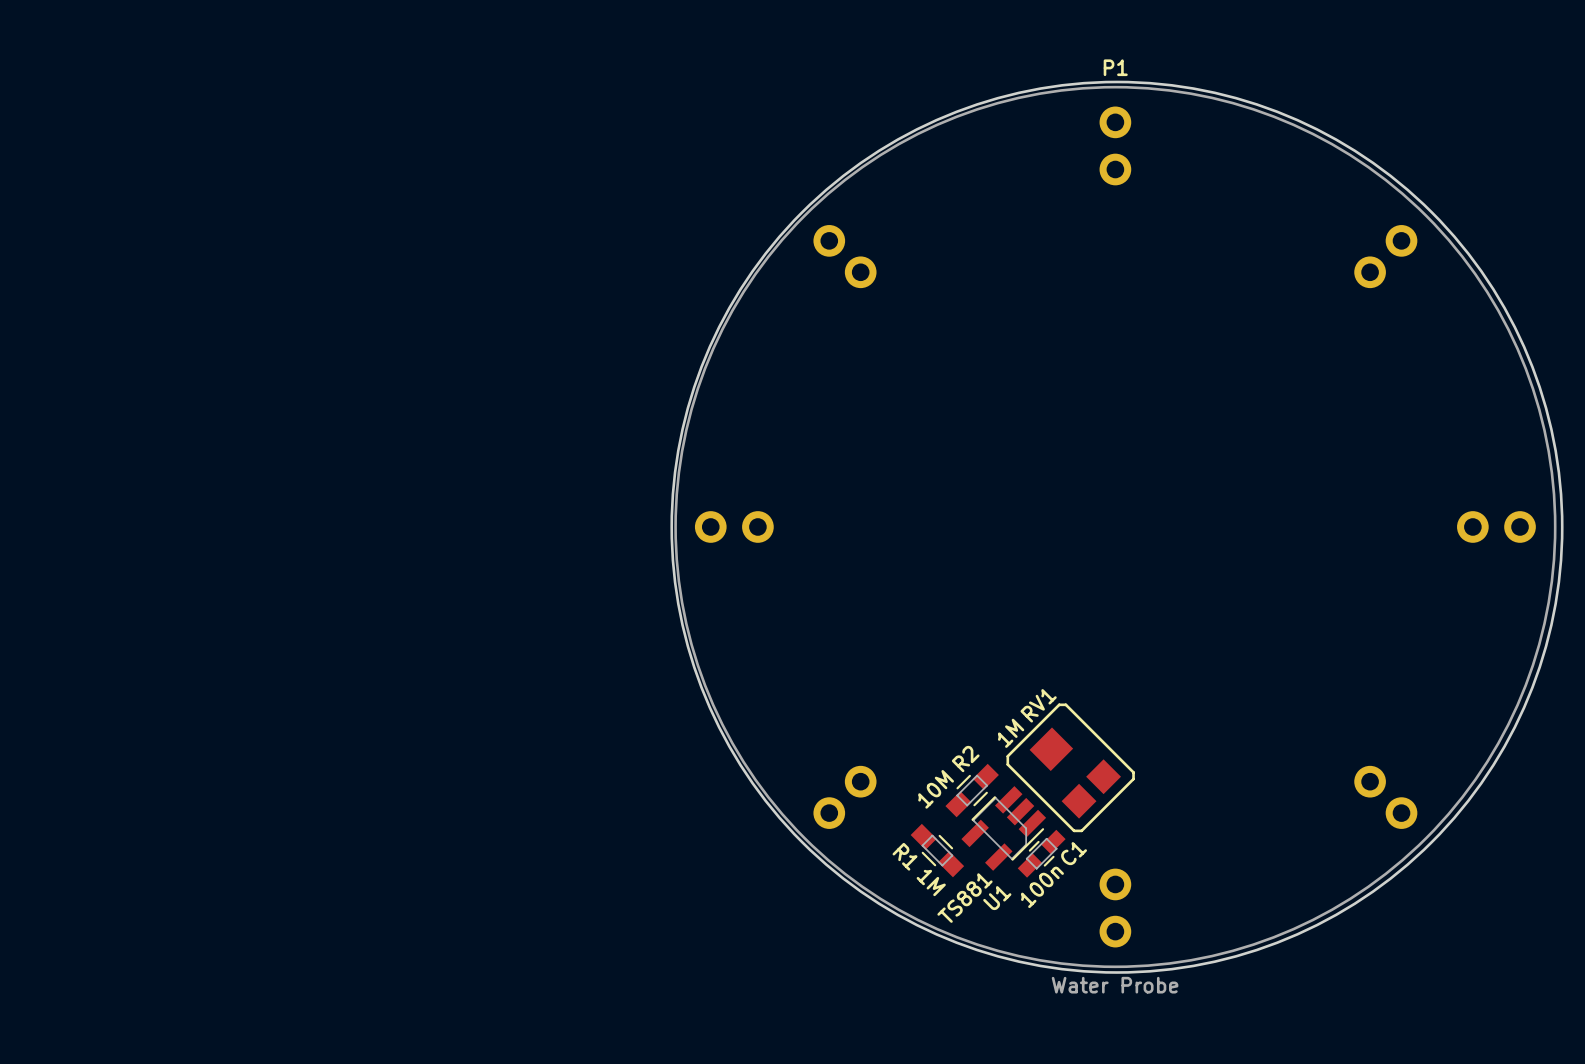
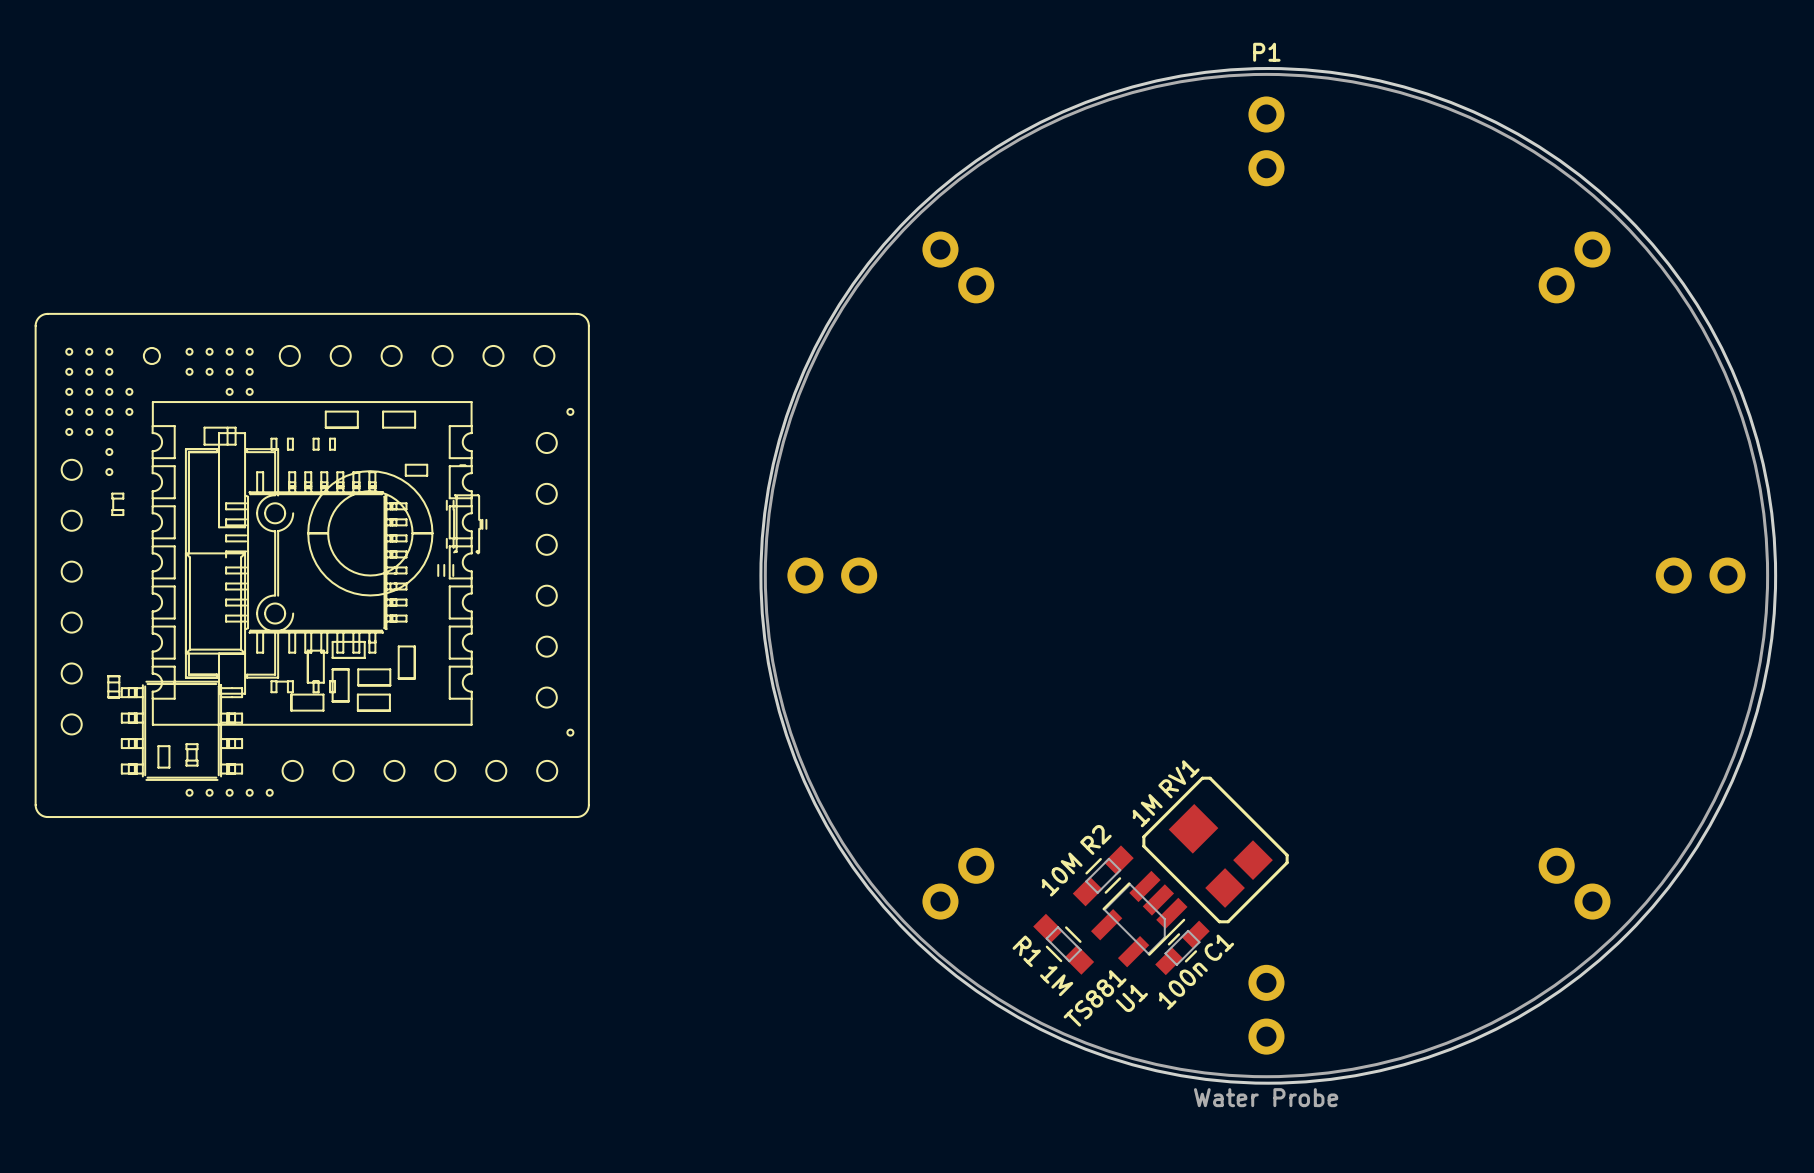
line: none -> (47, 313) (576, 313) (585, 317) (588, 325) (588, 805) (585, 813) (576, 817) (47, 817) (39, 813) (35, 805) (35, 325) (39, 317) (47, 313)
drawing: none -> [278, 344, 301, 368]
drawing: none -> [329, 344, 352, 368]
drawing: none -> [380, 344, 403, 368]
drawing: none -> [431, 344, 454, 368]
drawing: none -> [482, 344, 505, 368]
drawing: none -> [533, 344, 556, 368]
drawing: none -> [142, 346, 161, 366]
drawing: none -> [60, 347, 134, 481]
drawing: none -> [185, 347, 254, 396]
drawing: none -> [535, 407, 575, 455]
line: none -> (325, 411) (357, 411) (357, 427) (325, 427) (325, 411)
line: none -> (383, 411) (415, 411) (415, 427) (383, 427) (383, 411)
line: none -> (152, 426) (152, 402) (471, 402) (471, 426)
line: none -> (449, 426) (449, 458) (471, 458) (471, 451) (465, 448) (462, 442) (465, 435) (471, 433) (471, 426) (449, 426)
line: none -> (204, 427) (235, 427) (235, 444) (204, 444) (204, 427)
line: none -> (227, 427) (227, 444)
line: none -> (219, 433) (219, 527) (245, 527) (245, 433) (219, 433)
line: none -> (271, 438) (276, 438) (276, 449) (271, 449) (271, 438)
line: none -> (287, 438) (292, 438) (292, 449) (287, 449) (287, 438)
line: none -> (313, 438) (313, 449) (318, 449) (318, 438) (313, 438)
line: none -> (330, 438) (335, 438) (335, 449) (330, 449) (330, 438)
line: none -> (153, 451) (152, 458) (174, 458) (174, 426) (152, 426) (152, 433) (159, 435) (162, 442) (159, 448) (153, 451)
line: none -> (152, 458) (152, 466)
line: none -> (471, 458) (471, 466)
line: none -> (405, 464) (405, 475) (427, 475) (427, 464) (405, 464)
line: none -> (460, 465) (465, 465)
line: none -> (449, 466) (449, 498) (471, 498) (471, 491) (465, 488) (462, 482) (465, 475) (471, 473) (471, 466) (449, 466)
line: none -> (289, 482) (295, 482)
line: none -> (305, 482) (311, 482)
line: none -> (321, 482) (327, 482)
line: none -> (337, 482) (343, 482)
line: none -> (353, 482) (359, 482)
line: none -> (369, 482) (375, 482)
drawing: none -> [535, 482, 558, 505]
line: none -> (289, 486) (295, 486)
line: none -> (305, 486) (311, 486)
line: none -> (321, 486) (327, 486)
line: none -> (337, 486) (343, 486)
line: none -> (353, 486) (359, 486)
line: none -> (369, 486) (375, 486)
line: none -> (289, 488) (295, 488)
line: none -> (305, 488) (311, 488)
line: none -> (321, 488) (327, 488)
line: none -> (337, 488) (343, 488)
line: none -> (353, 488) (359, 488)
line: none -> (369, 488) (375, 488)
line: none -> (153, 491) (152, 498) (174, 498) (174, 466) (152, 466) (152, 473) (159, 475) (162, 482) (159, 488) (153, 491)
line: none -> (249, 492) (382, 492) (381, 494) (250, 494) (249, 492)
line: none -> (257, 492) (257, 472) (263, 472) (263, 492)
line: none -> (289, 492) (289, 472) (295, 472) (295, 492)
line: none -> (305, 492) (305, 472) (311, 472) (311, 492)
line: none -> (321, 492) (321, 472) (327, 472) (327, 492)
line: none -> (337, 492) (337, 472) (343, 472) (343, 492)
line: none -> (353, 492) (353, 472) (359, 472) (359, 492)
line: none -> (369, 492) (369, 472) (375, 472) (375, 492)
line: none -> (112, 493) (112, 498) (123, 498) (123, 493) (112, 493)
line: none -> (246, 495) (248, 496) (248, 628) (246, 629)
line: none -> (278, 495) (278, 449) (247, 449) (247, 452) (275, 452) (275, 495) (262, 500) (257, 513) (262, 526) (275, 531) (275, 595) (262, 600) (257, 613) (262, 626) (275, 631) (275, 674) (247, 674) (247, 677) (278, 677) (278, 631) (288, 625) (293, 613)
line: none -> (386, 495) (386, 629) (384, 628) (384, 496) (386, 495)
line: none -> (113, 498) (113, 510)
line: none -> (152, 498) (152, 506)
line: none -> (471, 498) (471, 506)
line: none -> (446, 500) (446, 509)
line: none -> (453, 500) (453, 509)
line: none -> (246, 503) (226, 503) (226, 509) (246, 509)
line: none -> (386, 503) (406, 503) (406, 509) (386, 509)
line: none -> (390, 503) (390, 509)
line: none -> (392, 503) (392, 509)
line: none -> (396, 503) (396, 509)
line: none -> (449, 506) (449, 538) (471, 538) (471, 531) (465, 528) (462, 522) (465, 515) (471, 513) (471, 506) (449, 506)
drawing: none -> [60, 509, 83, 532]
line: none -> (112, 510) (112, 515) (123, 515) (123, 510) (112, 510)
line: none -> (454, 509) (454, 538)
line: none -> (265, 513) (268, 506) (275, 503) (282, 506) (285, 513) (282, 520) (275, 523) (268, 520) (265, 513)
line: none -> (293, 513) (288, 524) (278, 531) (278, 595)
line: none -> (246, 519) (226, 519) (226, 525) (246, 525)
line: none -> (386, 519) (406, 519) (406, 525) (386, 525)
line: none -> (390, 519) (390, 525)
line: none -> (392, 519) (392, 525)
line: none -> (396, 519) (396, 525)
line: none -> (479, 519) (478, 495) (455, 495) (456, 551) (454, 552)
line: none -> (480, 519) (480, 528)
line: none -> (482, 519) (482, 528)
line: none -> (486, 519) (486, 528)
line: none -> (479, 528) (479, 552) (476, 551) (478, 553)
line: none -> (153, 531) (152, 538) (174, 538) (174, 506) (152, 506) (152, 513) (159, 515) (162, 522) (159, 528) (153, 531)
line: none -> (308, 533) (328, 533)
line: none -> (308, 533) (312, 509) (326, 489) (346, 475) (370, 471) (394, 475) (414, 489) (427, 509) (432, 533)
line: none -> (308, 533) (312, 557) (326, 577) (346, 590) (370, 595) (394, 590) (414, 577) (427, 557) (432, 533)
line: none -> (328, 533) (331, 517) (340, 503) (354, 494) (370, 491) (386, 494) (400, 503) (409, 517) (412, 533)
line: none -> (328, 533) (331, 549) (340, 563) (354, 572) (370, 575) (386, 572) (400, 563) (409, 549) (412, 533)
line: none -> (412, 533) (432, 533)
drawing: none -> [535, 533, 558, 556]
line: none -> (246, 535) (226, 535) (226, 541) (246, 541)
line: none -> (386, 535) (406, 535) (406, 541) (386, 541)
line: none -> (390, 535) (390, 541)
line: none -> (392, 535) (392, 541)
line: none -> (396, 535) (396, 541)
line: none -> (152, 538) (152, 546)
line: none -> (446, 538) (446, 547)
line: none -> (453, 538) (453, 547)
line: none -> (471, 538) (471, 546)
line: none -> (449, 546) (449, 578) (471, 578) (471, 571) (465, 568) (462, 562) (465, 556) (471, 553) (471, 546) (449, 546)
line: none -> (246, 551) (226, 551) (226, 557)
line: none -> (386, 551) (406, 551) (406, 557) (386, 557)
line: none -> (390, 551) (390, 557)
line: none -> (392, 551) (392, 557)
line: none -> (396, 551) (396, 557)
line: none -> (188, 553) (188, 452) (217, 452) (217, 449) (185, 449) (185, 677) (217, 677) (217, 674) (188, 674) (188, 653)
line: none -> (245, 553) (245, 693) (219, 693) (219, 653)
line: none -> (245, 553) (185, 553) (189, 557) (189, 649)
line: none -> (245, 553) (241, 557) (241, 649)
drawing: none -> [60, 560, 83, 583]
line: none -> (438, 564) (438, 575)
line: none -> (444, 564) (444, 575)
line: none -> (453, 564) (453, 575)
line: none -> (246, 567) (226, 567) (226, 573) (246, 573)
line: none -> (386, 567) (406, 567) (406, 573) (386, 573)
line: none -> (396, 567) (396, 573)
line: none -> (153, 571) (152, 578) (174, 578) (174, 546) (152, 546) (152, 553) (159, 556) (162, 562) (159, 568) (153, 571)
line: none -> (152, 578) (152, 586)
line: none -> (471, 578) (471, 586)
line: none -> (246, 583) (226, 583) (226, 589) (246, 589)
line: none -> (386, 583) (406, 583) (406, 589) (386, 589)
line: none -> (390, 583) (390, 589)
line: none -> (396, 583) (396, 589)
drawing: none -> [535, 584, 558, 607]
line: none -> (449, 586) (449, 618) (471, 618) (471, 611) (465, 608) (462, 602) (465, 596) (471, 593) (471, 586) (449, 586)
line: none -> (246, 599) (226, 599) (226, 605) (246, 605)
line: none -> (386, 599) (406, 599) (406, 605) (386, 605)
line: none -> (390, 599) (390, 605)
line: none -> (392, 599) (392, 605)
line: none -> (396, 599) (396, 605)
drawing: none -> [60, 611, 83, 634]
line: none -> (153, 611) (152, 618) (174, 618) (174, 586) (152, 586) (152, 593) (159, 596) (162, 602) (159, 608) (153, 611)
line: none -> (265, 613) (268, 606) (275, 603) (282, 606) (285, 613) (282, 620) (275, 623) (268, 620) (265, 613)
line: none -> (246, 615) (226, 615) (226, 621) (246, 621)
line: none -> (386, 615) (406, 615) (406, 621) (386, 621)
line: none -> (390, 615) (390, 621)
line: none -> (392, 615) (392, 621)
line: none -> (396, 615) (396, 621)
line: none -> (152, 618) (152, 626)
line: none -> (471, 618) (471, 626)
line: none -> (449, 626) (449, 658) (471, 658) (471, 651) (465, 648) (462, 642) (465, 636) (471, 633) (471, 626) (449, 626)
line: none -> (250, 630) (249, 632) (382, 632) (381, 630) (250, 630)
line: none -> (257, 632) (257, 652) (263, 652) (263, 632)
line: none -> (289, 632) (289, 652) (295, 652) (295, 632)
line: none -> (305, 632) (305, 652) (311, 652) (311, 632)
line: none -> (321, 632) (321, 652) (327, 652) (327, 632)
line: none -> (337, 632) (337, 652) (343, 652) (343, 632)
line: none -> (353, 632) (353, 652) (359, 652) (359, 632)
line: none -> (369, 632) (369, 652) (375, 652) (375, 632)
drawing: none -> [535, 635, 558, 658]
line: none -> (332, 641) (332, 657) (364, 657) (364, 641) (332, 641)
line: none -> (369, 642) (375, 642)
line: none -> (398, 646) (414, 646) (414, 678) (398, 678) (398, 646)
line: none -> (189, 649) (185, 653) (245, 653) (241, 649)
line: none -> (189, 649) (241, 649)
line: none -> (307, 650) (307, 682) (323, 682) (323, 650) (307, 650)
line: none -> (153, 651) (152, 658) (174, 658) (174, 626) (152, 626) (152, 633) (159, 636) (162, 642) (159, 648) (153, 651)
line: none -> (152, 658) (152, 666)
line: none -> (471, 658) (471, 666)
drawing: none -> [60, 662, 83, 685]
line: none -> (449, 666) (449, 698) (471, 698) (471, 691) (465, 689) (462, 682) (465, 676) (471, 673) (471, 666) (449, 666)
line: none -> (332, 669) (348, 669) (348, 701) (332, 701) (332, 669)
line: none -> (358, 669) (390, 669) (390, 685) (358, 685) (358, 669)
line: none -> (108, 676) (119, 676) (119, 697) (108, 697) (108, 676)
line: none -> (271, 681) (271, 692) (276, 692) (276, 681) (271, 681)
line: none -> (287, 681) (287, 692) (292, 692) (292, 681) (287, 681)
line: none -> (313, 681) (313, 692) (318, 692) (318, 681) (313, 681)
line: none -> (330, 681) (330, 692) (335, 692) (335, 681) (330, 681)
line: none -> (108, 682) (119, 682)
line: none -> (146, 681) (217, 681)
line: none -> (276, 681) (287, 681)
line: none -> (147, 684) (216, 684)
line: none -> (142, 685) (142, 776)
line: none -> (145, 686) (145, 775)
drawing: none -> [535, 686, 575, 737]
line: none -> (128, 688) (128, 697)
line: none -> (134, 688) (134, 697)
line: none -> (136, 688) (136, 697)
line: none -> (142, 688) (121, 688) (121, 697) (142, 697)
line: none -> (221, 688) (242, 688) (242, 697) (221, 697)
line: none -> (108, 691) (119, 691)
line: none -> (153, 691) (152, 698) (174, 698) (174, 666) (152, 666) (152, 673) (159, 676) (162, 682) (159, 689) (153, 691)
line: none -> (291, 694) (291, 710) (323, 710) (323, 694) (291, 694)
line: none -> (357, 694) (389, 694) (389, 710) (357, 710) (357, 694)
line: none -> (152, 698) (152, 724) (471, 724) (471, 698)
drawing: none -> [60, 713, 83, 736]
line: none -> (128, 713) (128, 722)
line: none -> (134, 713) (134, 722)
line: none -> (136, 713) (136, 722)
line: none -> (142, 713) (121, 713) (121, 722) (142, 722)
line: none -> (221, 713) (242, 713) (242, 722) (221, 722)
line: none -> (227, 713) (227, 722)
line: none -> (229, 713) (229, 722)
line: none -> (235, 713) (235, 722)
line: none -> (128, 739) (128, 748)
line: none -> (134, 739) (134, 748)
line: none -> (136, 739) (136, 748)
line: none -> (142, 739) (121, 739) (121, 748) (142, 748)
line: none -> (221, 739) (242, 739) (242, 748) (221, 748)
line: none -> (227, 739) (227, 748)
line: none -> (229, 739) (229, 748)
line: none -> (235, 739) (235, 748)
line: none -> (186, 744) (186, 749) (197, 749) (197, 744) (186, 744)
line: none -> (158, 746) (169, 746) (169, 767) (158, 767) (158, 746)
line: none -> (187, 749) (187, 760)
line: none -> (196, 749) (196, 760)
drawing: none -> [185, 759, 304, 797]
drawing: none -> [332, 759, 355, 782]
drawing: none -> [383, 759, 406, 782]
drawing: none -> [434, 759, 457, 782]
drawing: none -> [485, 759, 508, 782]
drawing: none -> [536, 759, 559, 782]
line: none -> (186, 760) (186, 765) (197, 765) (197, 760) (186, 760)
line: none -> (128, 764) (128, 773)
line: none -> (134, 764) (134, 773)
line: none -> (136, 764) (136, 773)
line: none -> (142, 764) (121, 764) (121, 773) (142, 773)
line: none -> (221, 764) (242, 764) (242, 773) (221, 773)
line: none -> (227, 764) (227, 773)
line: none -> (229, 764) (229, 773)
line: none -> (235, 764) (235, 773)
line: none -> (218, 775) (218, 686) (221, 685) (221, 776)
line: none -> (147, 777) (216, 777)
line: none -> (146, 779) (217, 779)

